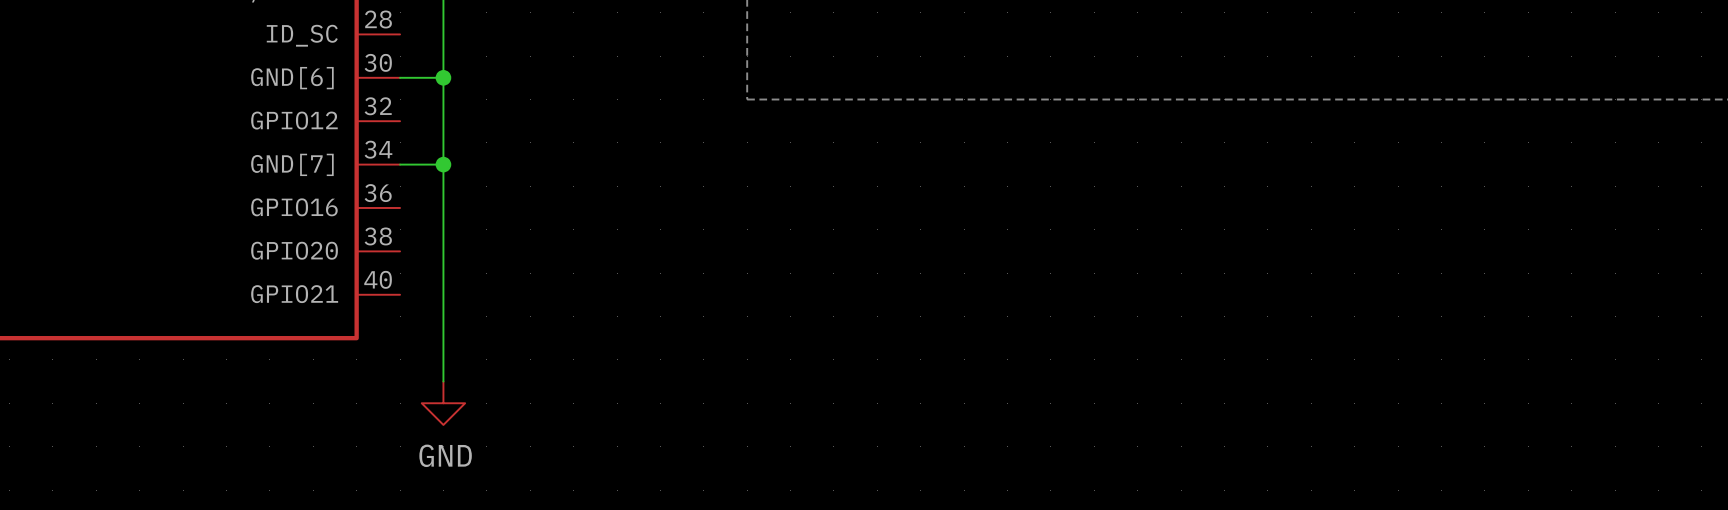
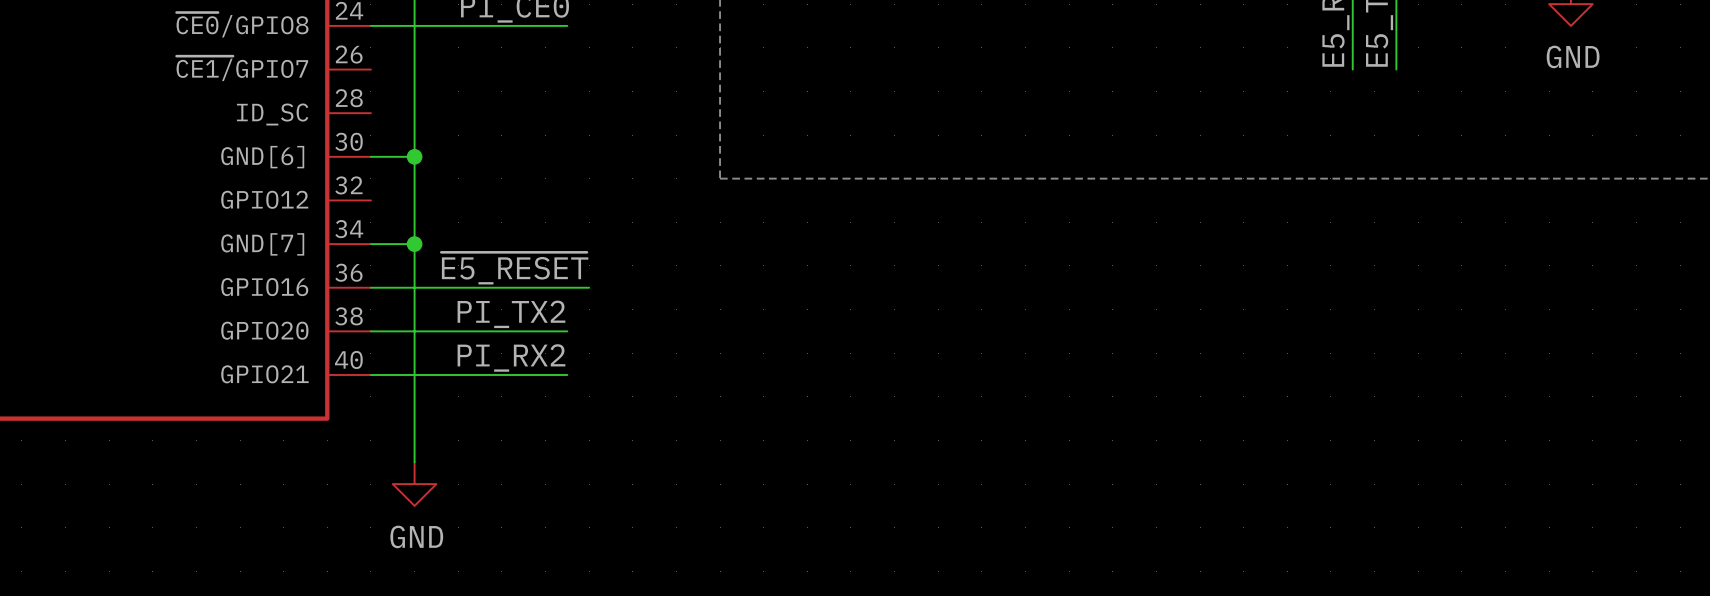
label: none -> ~{E5_RESET} (514, 268)
wire: none -> (370, 287) (589, 287)
label: none -> PI_TX2 (511, 314)
wire: none -> (370, 331) (567, 331)
label: none -> PI_RX2 (511, 357)
wire: none -> (370, 375) (567, 375)

